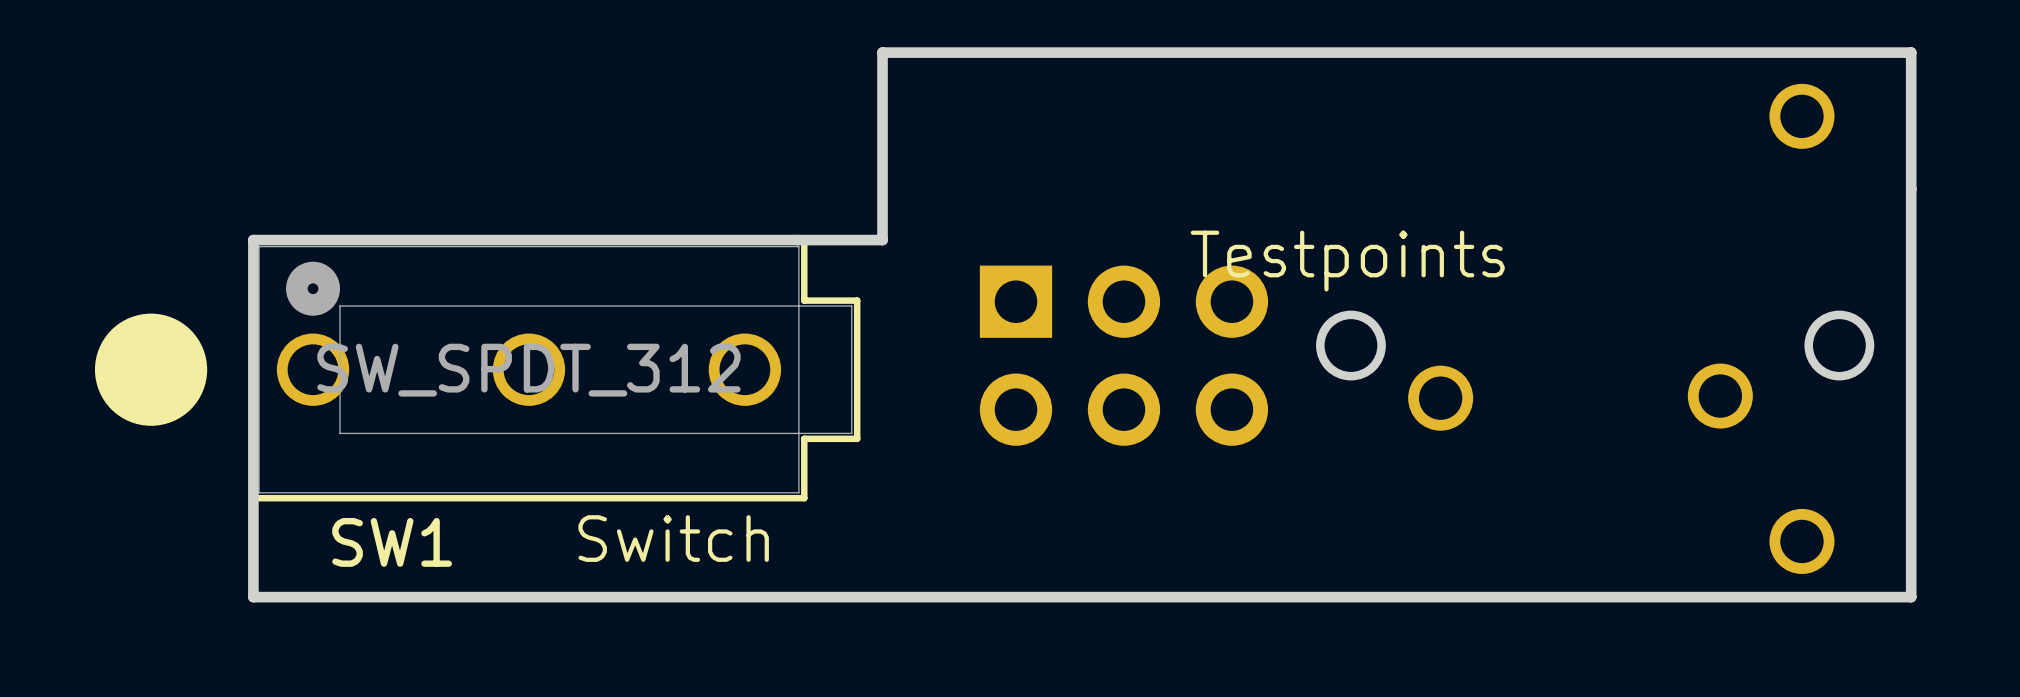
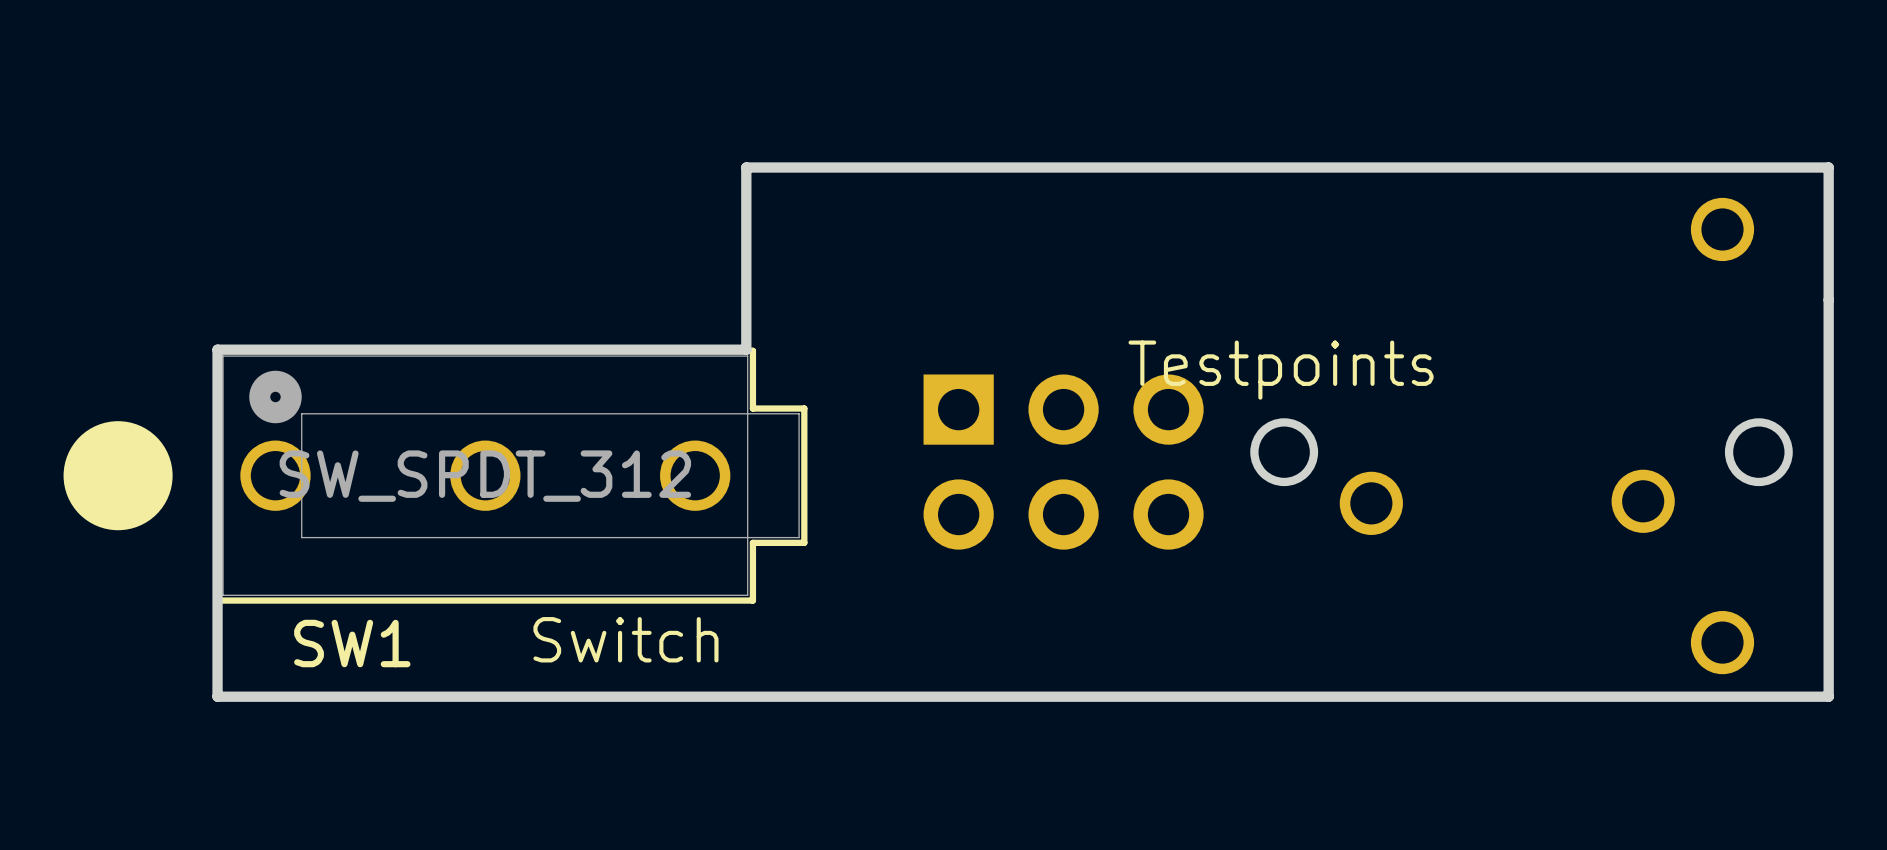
board edge: (882, 52) (882, 240) (797, 240) -> (828, 167) (746, 167) (746, 349)

